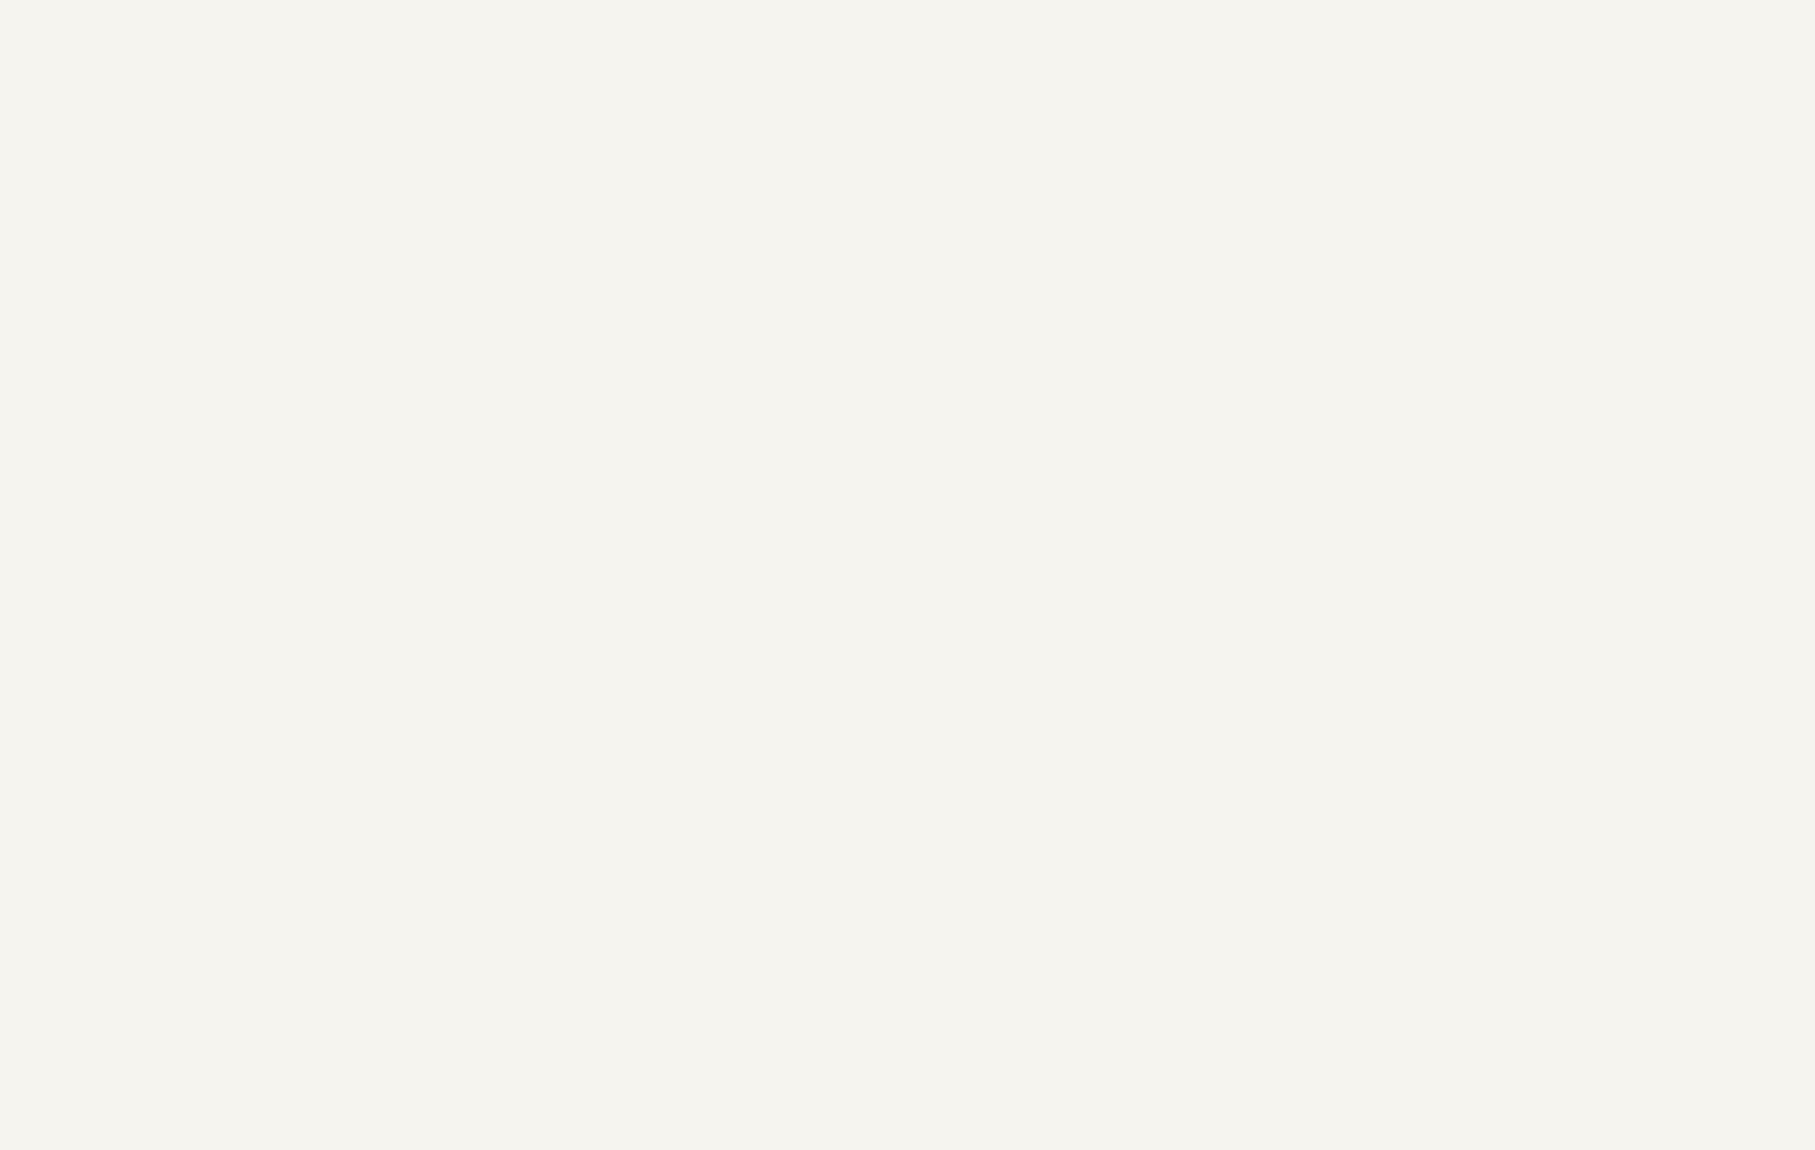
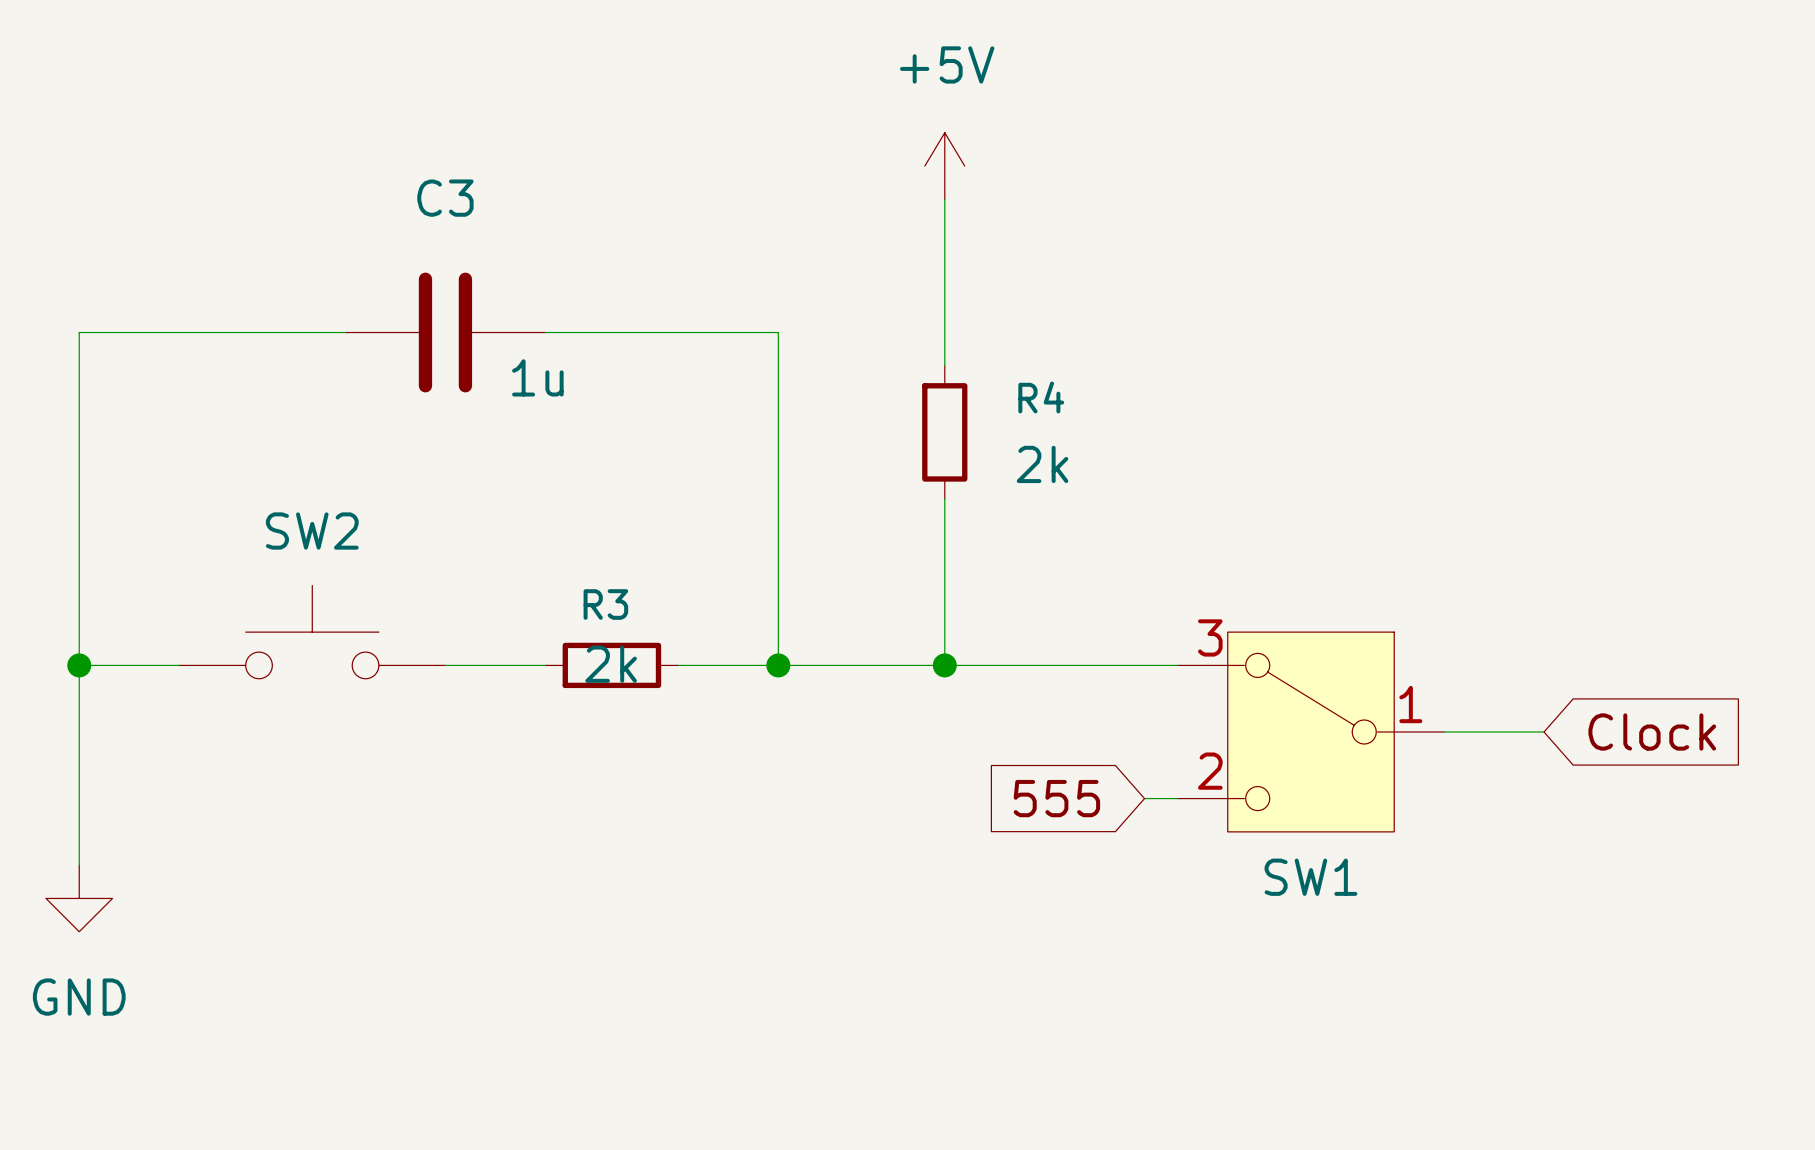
power symbol: none -> +5V (944, 166)
wire: none -> (944, 199) (944, 365)
wire: none -> (345, 332) (79, 332) (79, 865)
C3: none -> 1u (445, 332)
wire: none -> (545, 332) (778, 332) (778, 665)
R4: none -> 2k (944, 432)
wire: none -> (944, 498) (944, 665)
SW2: none -> (312, 632)
wire: none -> (79, 665) (179, 665)
junction: none -> (79, 665)
wire: none -> (445, 665) (545, 665)
R3: none -> 2k (611, 665)
wire: none -> (678, 665) (1177, 665)
junction: none -> (778, 665)
junction: none -> (944, 665)
SW1: none -> (1310, 732)
wire: none -> (1444, 732) (1544, 732)
global label: none -> Clock (1652, 732)
global label: none -> 555 (1056, 798)
wire: none -> (1144, 798) (1177, 798)
power symbol: none -> GND (79, 898)

